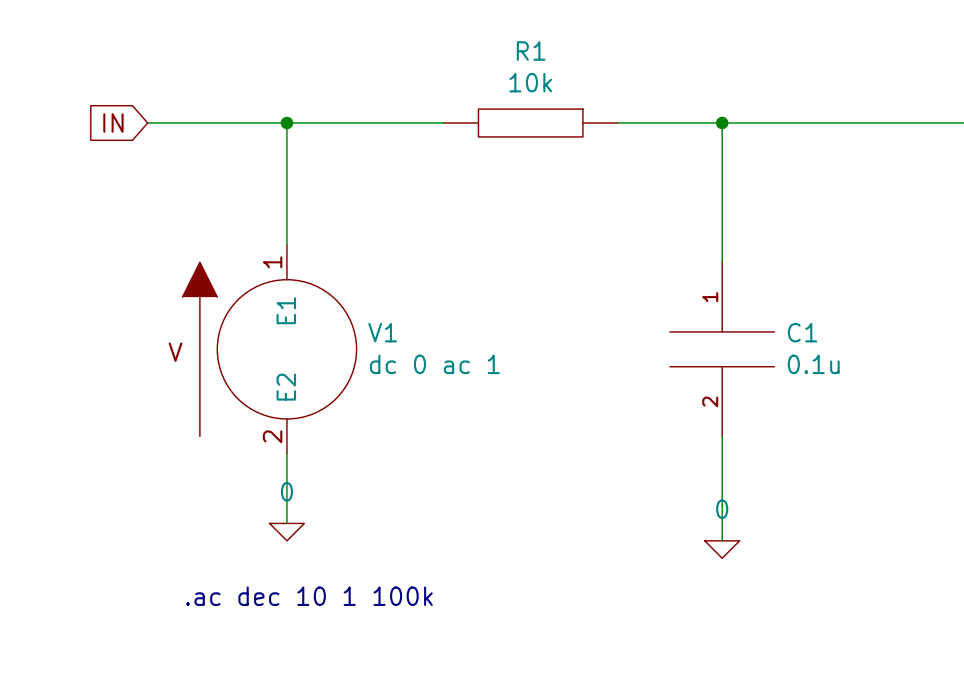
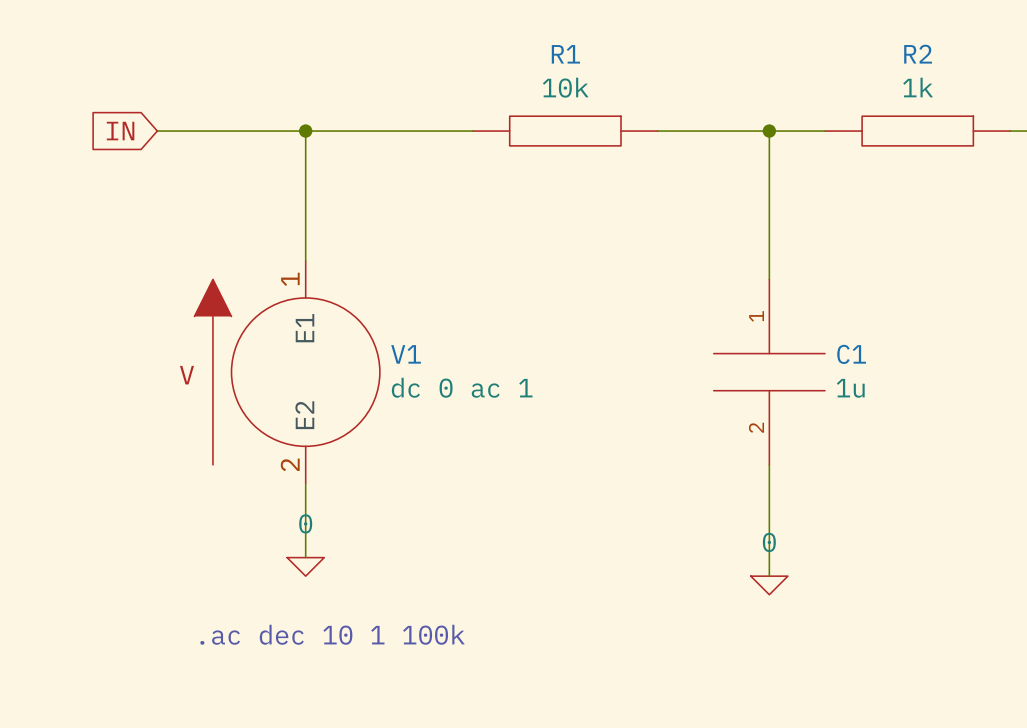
wire: (774, 123) (948, 123) -> none
R2: none -> 1k (917, 131)
C1 value: 0.1u (813, 364) -> 1u (850, 388)

